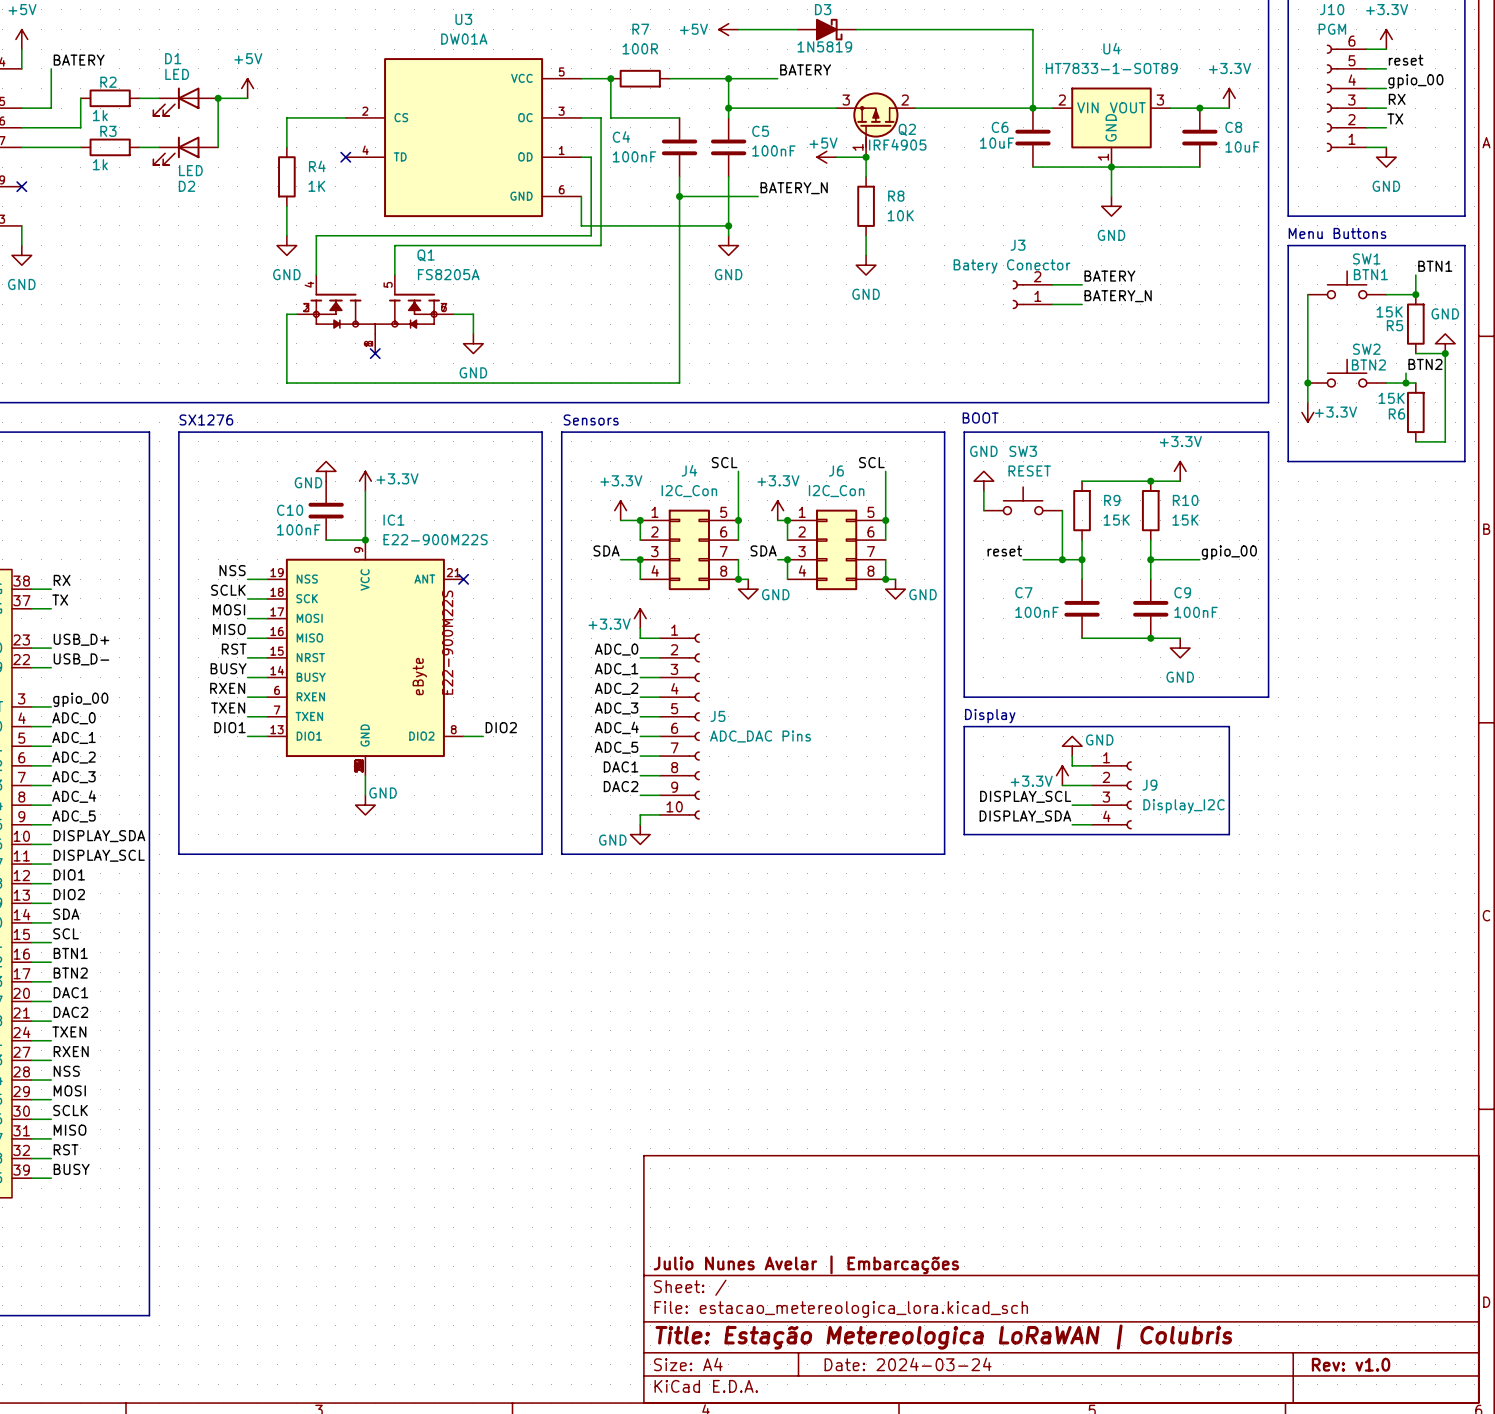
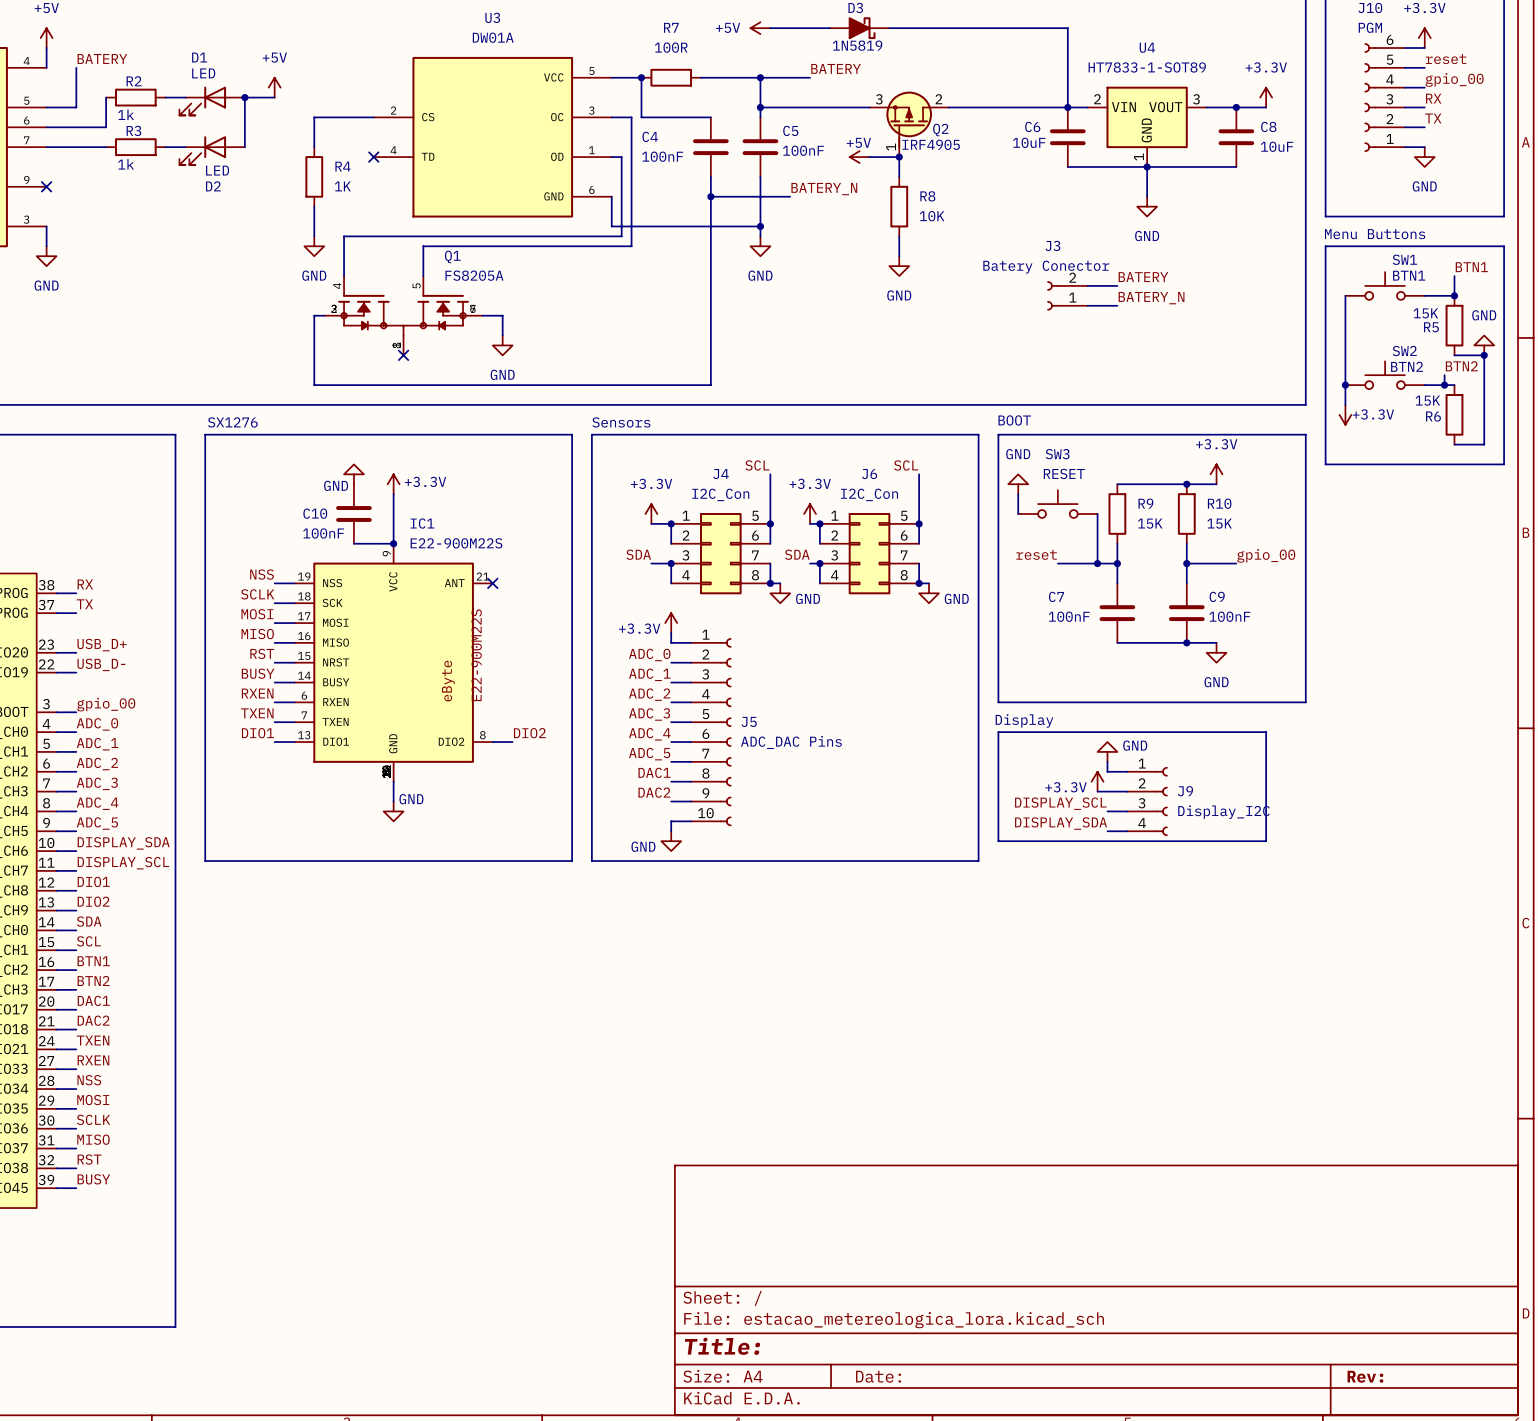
title block: Julio Nunes Avelar | Embarcações (806, 1264) -> none
title block: Title: Estação Metereologica LoRaWAN | Colubris (943, 1337) -> Title: (722, 1346)
title block: Date: 2024-03-24 (908, 1364) -> Date: (878, 1376)
title block: Rev: v1.0 (1351, 1364) -> Rev: (1365, 1376)

